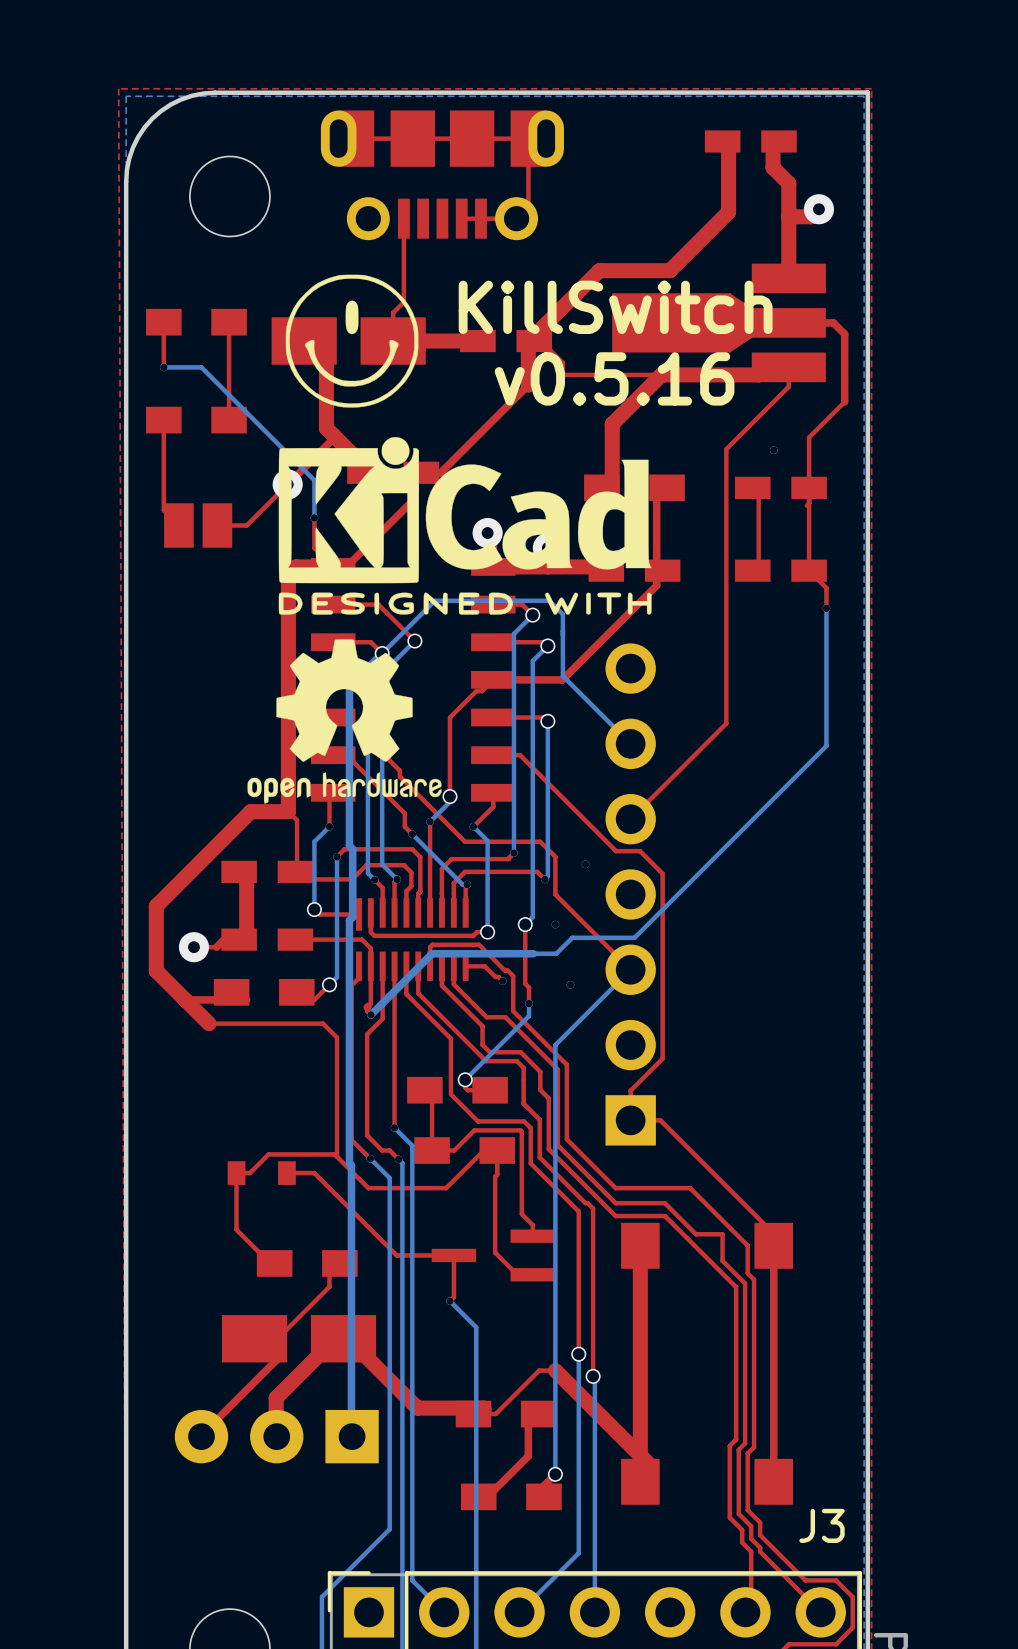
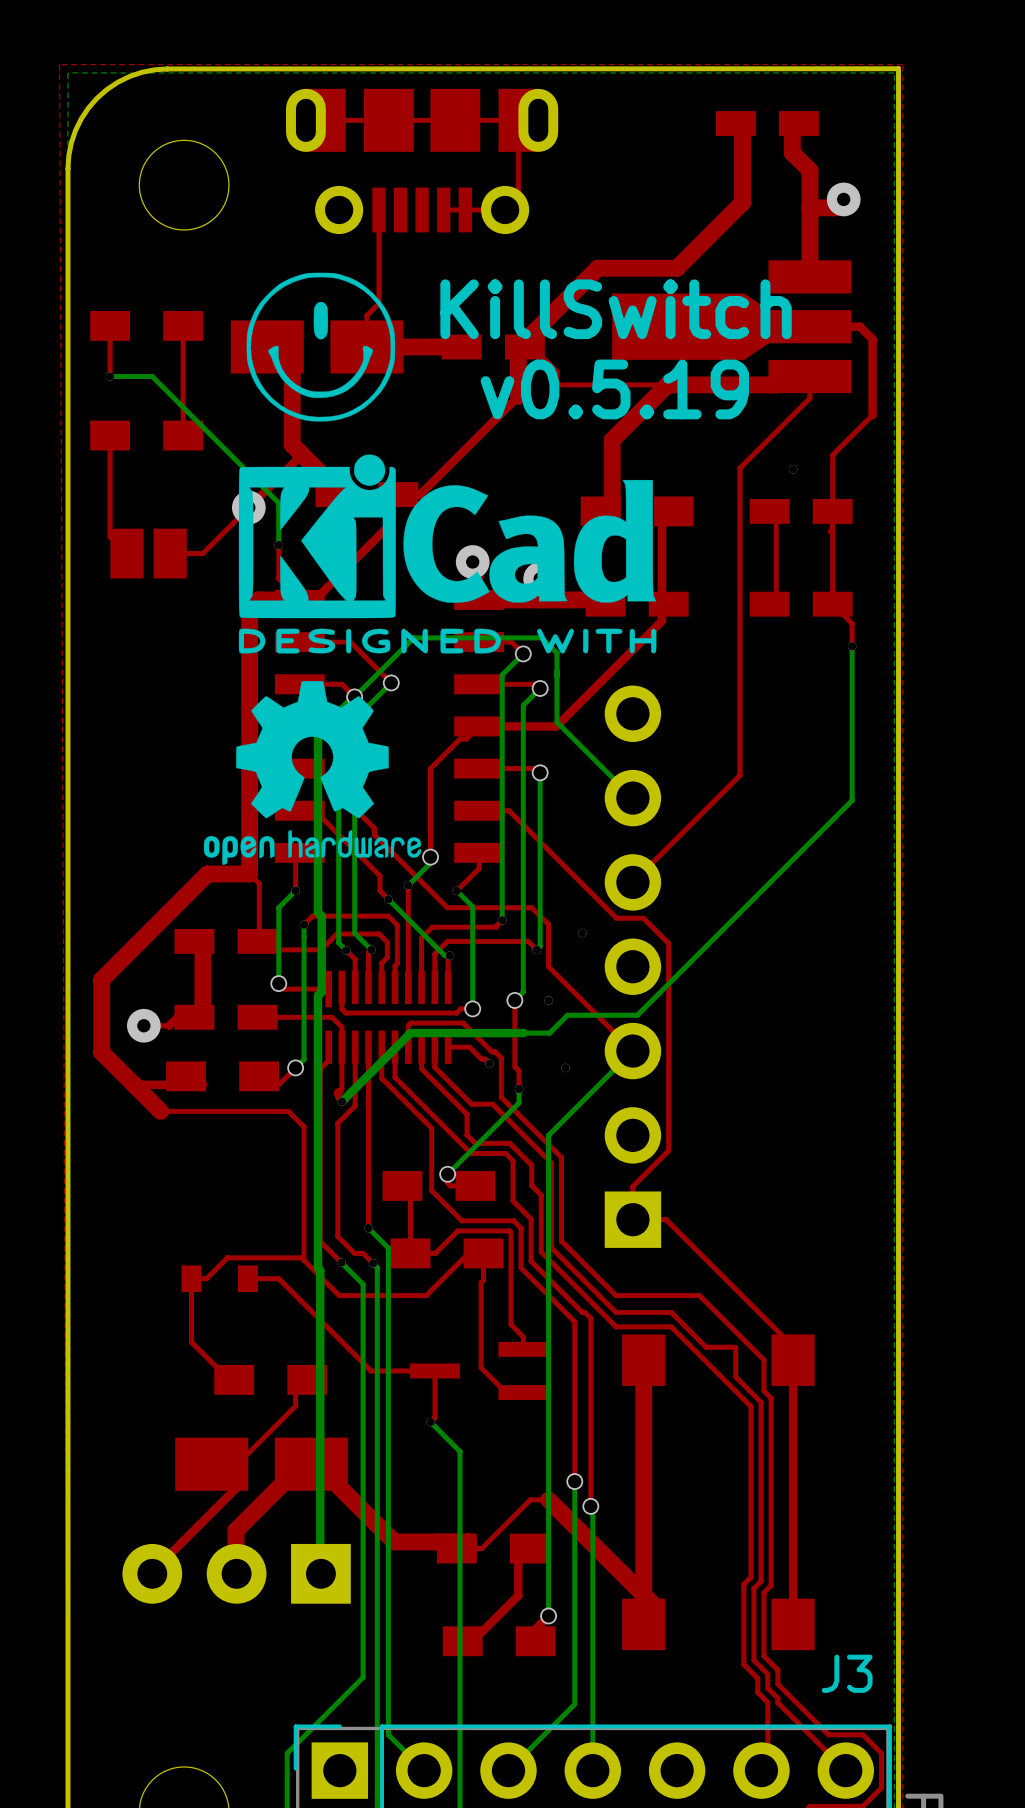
text: v0.5.16 (614, 378) -> v0.5.19 (614, 389)

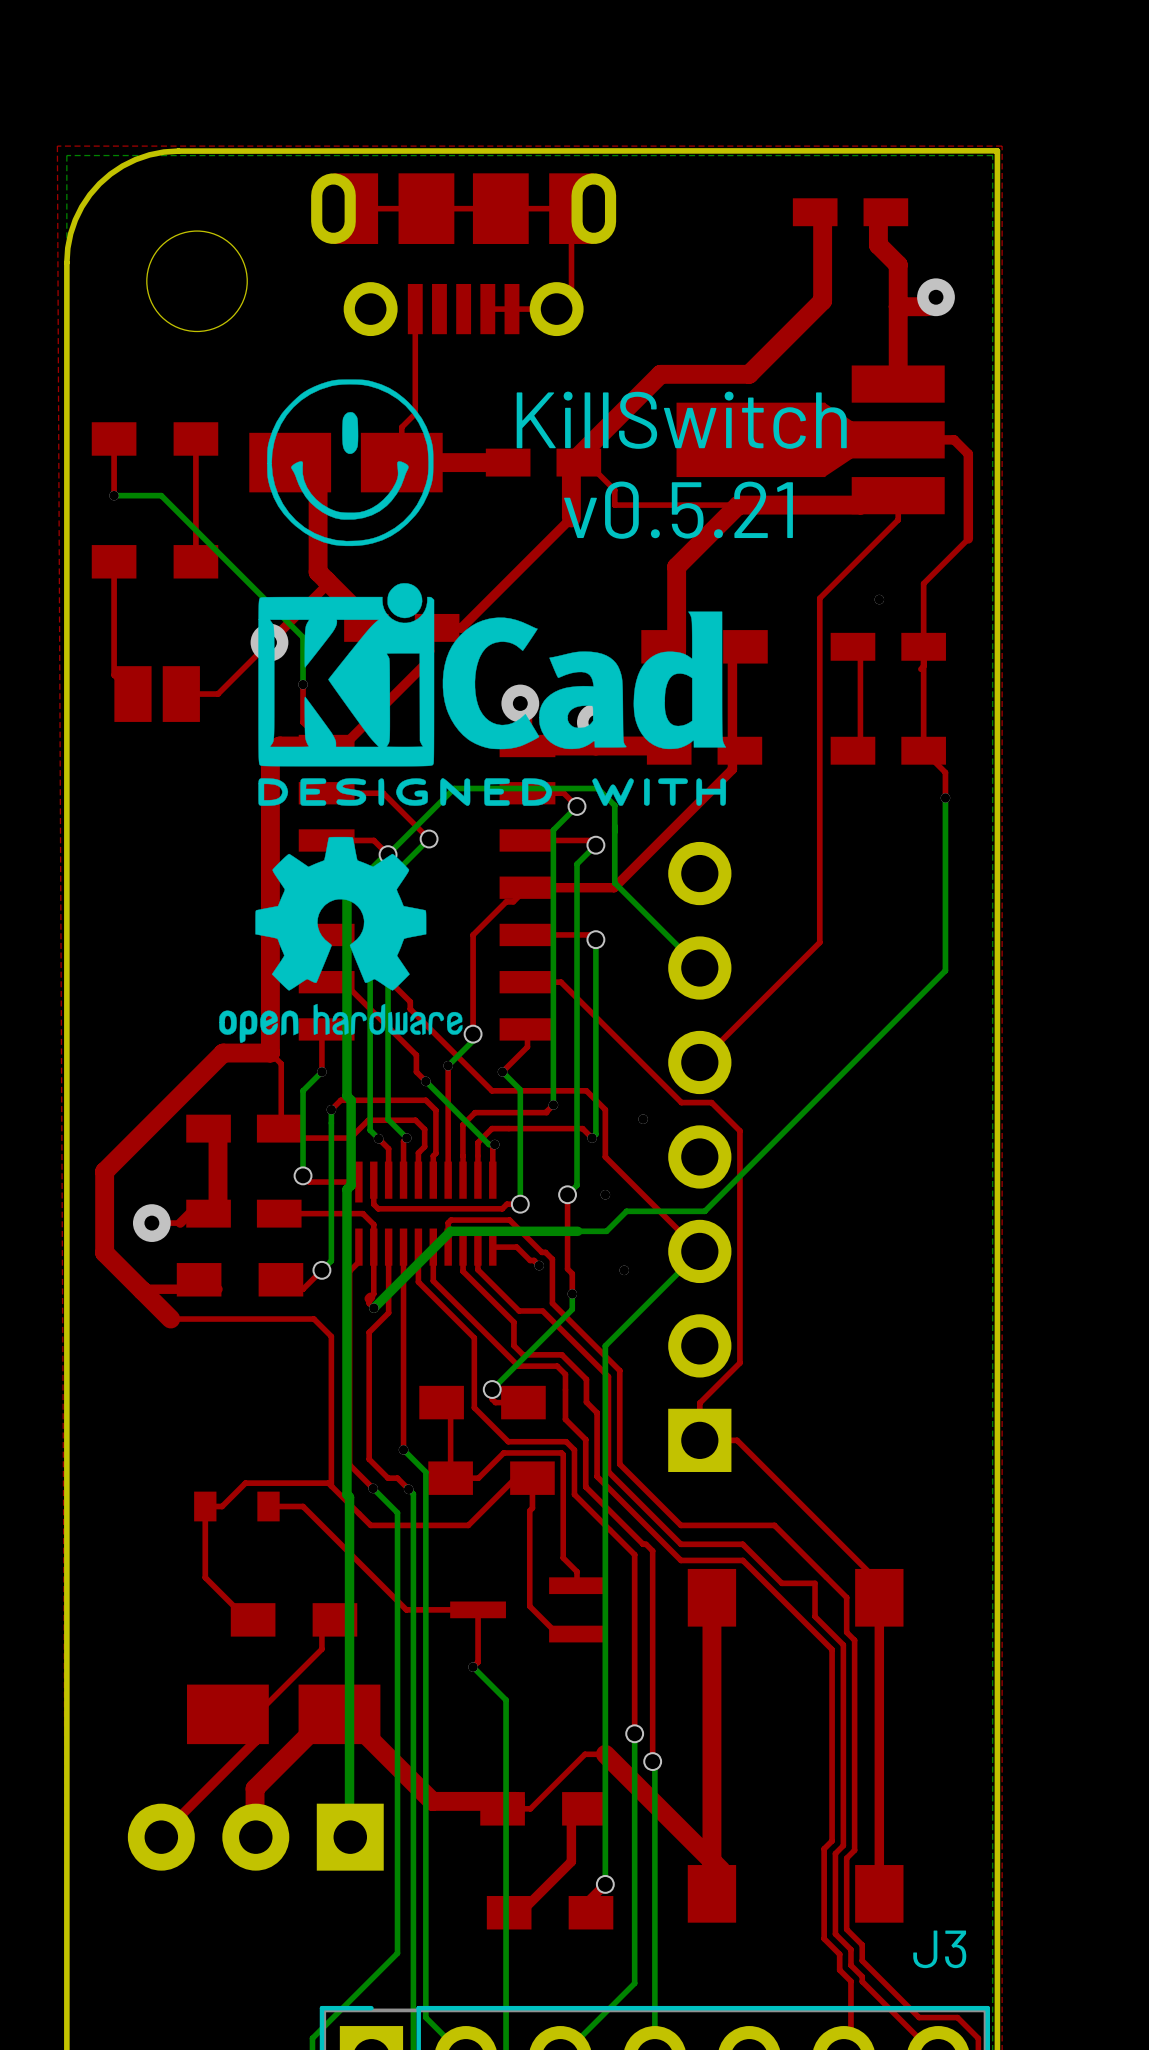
text: v0.5.19 (614, 389) -> v0.5.21 (678, 510)

